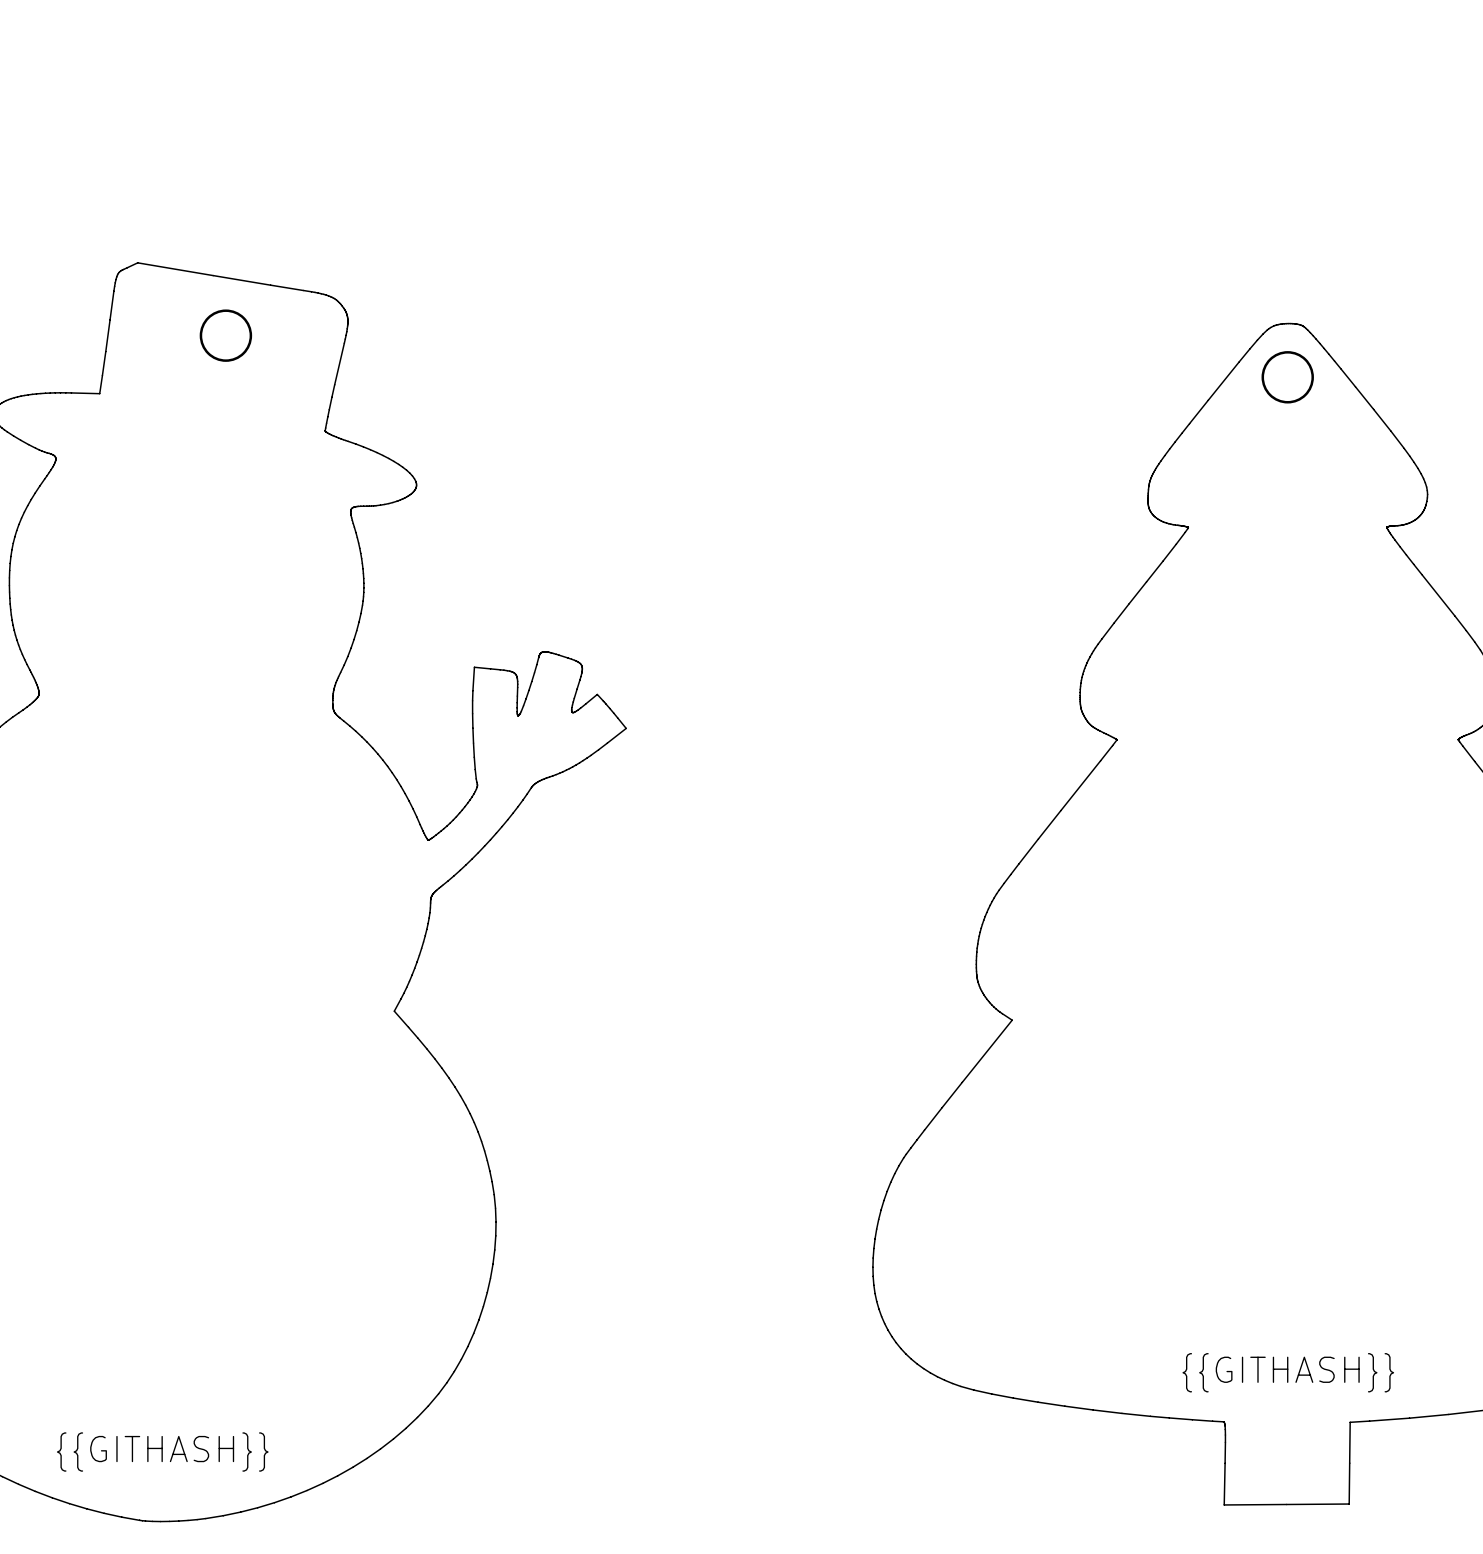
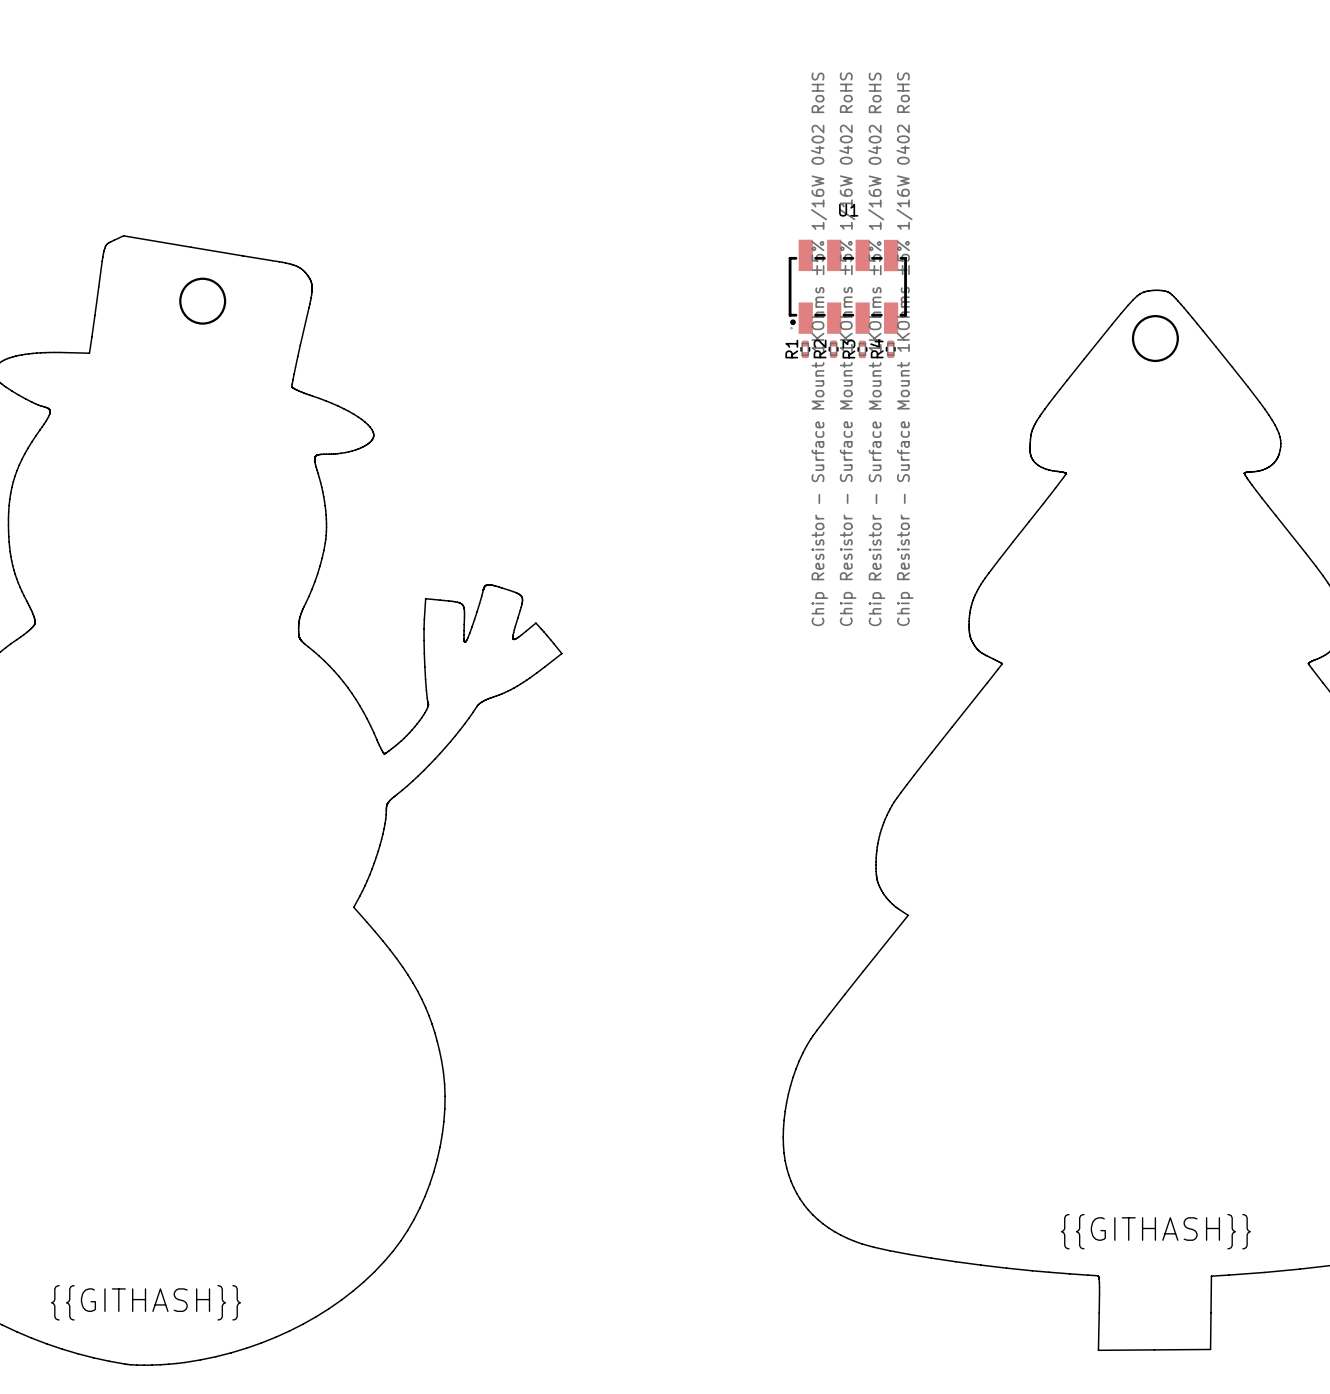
U1: none -> (847, 286)
R1: none -> Chip Resistor - Surface Mount 1KOhms ±5% 1/16W 0402 RoHS (805, 349)
R2: none -> Chip Resistor - Surface Mount 1KOhms ±5% 1/16W 0402 RoHS (833, 349)
R3: none -> Chip Resistor - Surface Mount 1KOhms ±5% 1/16W 0402 RoHS (862, 349)
R4: none -> Chip Resistor - Surface Mount 1KOhms ±5% 1/16W 0402 RoHS (890, 349)

